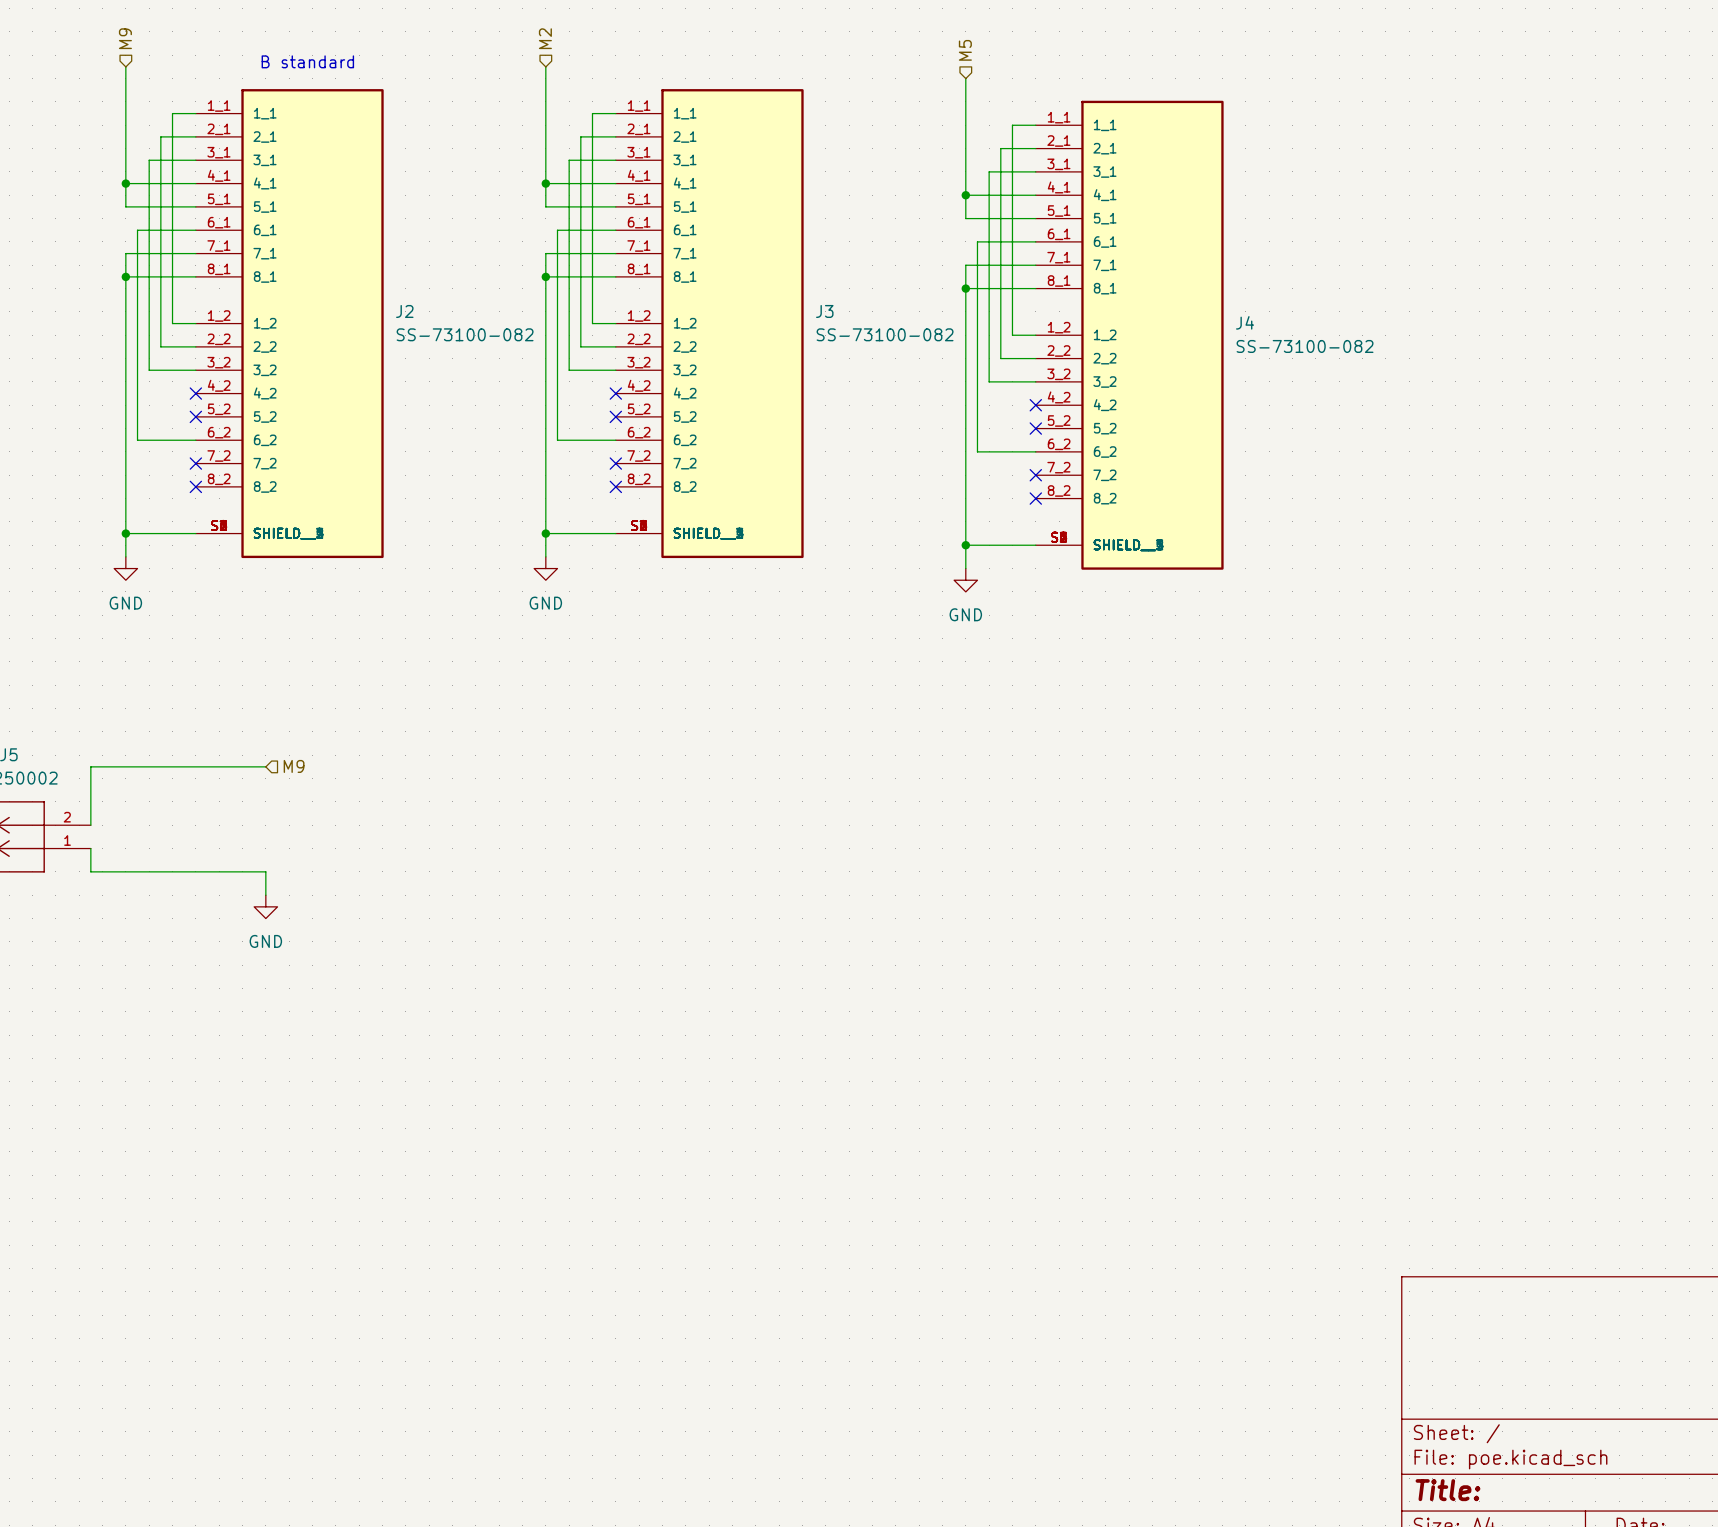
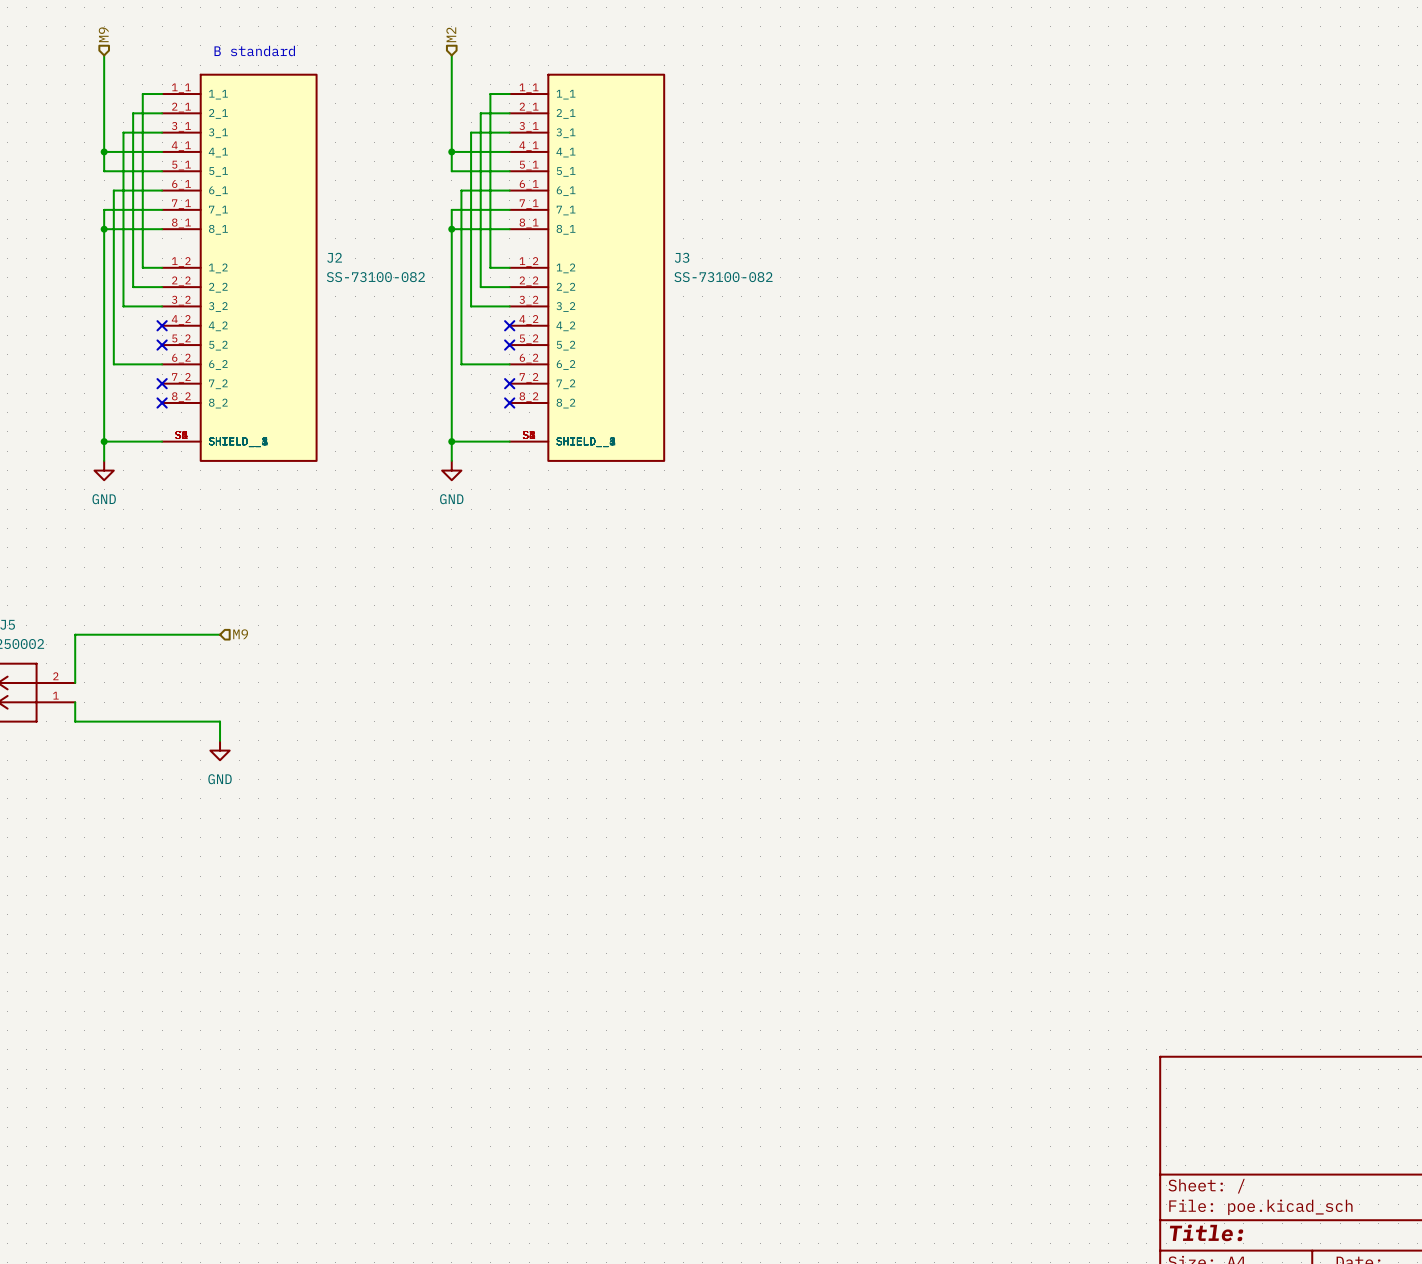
hierarchical label: M5 (965, 50) -> none
wire: (965, 78) (965, 218) (1035, 218) -> none
wire: (1035, 125) (1012, 125) (1012, 335) (1035, 335) -> none
wire: (1035, 148) (1000, 148) (1000, 358) (1035, 358) -> none
wire: (1035, 171) (989, 171) (989, 381) (1035, 381) -> none
wire: (965, 195) (1035, 195) -> none
junction: (965, 195) -> none
wire: (1035, 241) (977, 241) (977, 451) (1035, 451) -> none
wire: (1035, 265) (965, 265) (965, 568) -> none
wire: (965, 288) (1035, 288) -> none
junction: (965, 288) -> none
J4: SS-73100-082 (1129, 335) -> none
no-connect mark: (1035, 405) -> none
no-connect mark: (1035, 428) -> none
no-connect mark: (1035, 475) -> none
no-connect mark: (1035, 498) -> none
wire: (965, 545) (1035, 545) -> none
junction: (965, 545) -> none
power symbol: GND (965, 580) -> none

